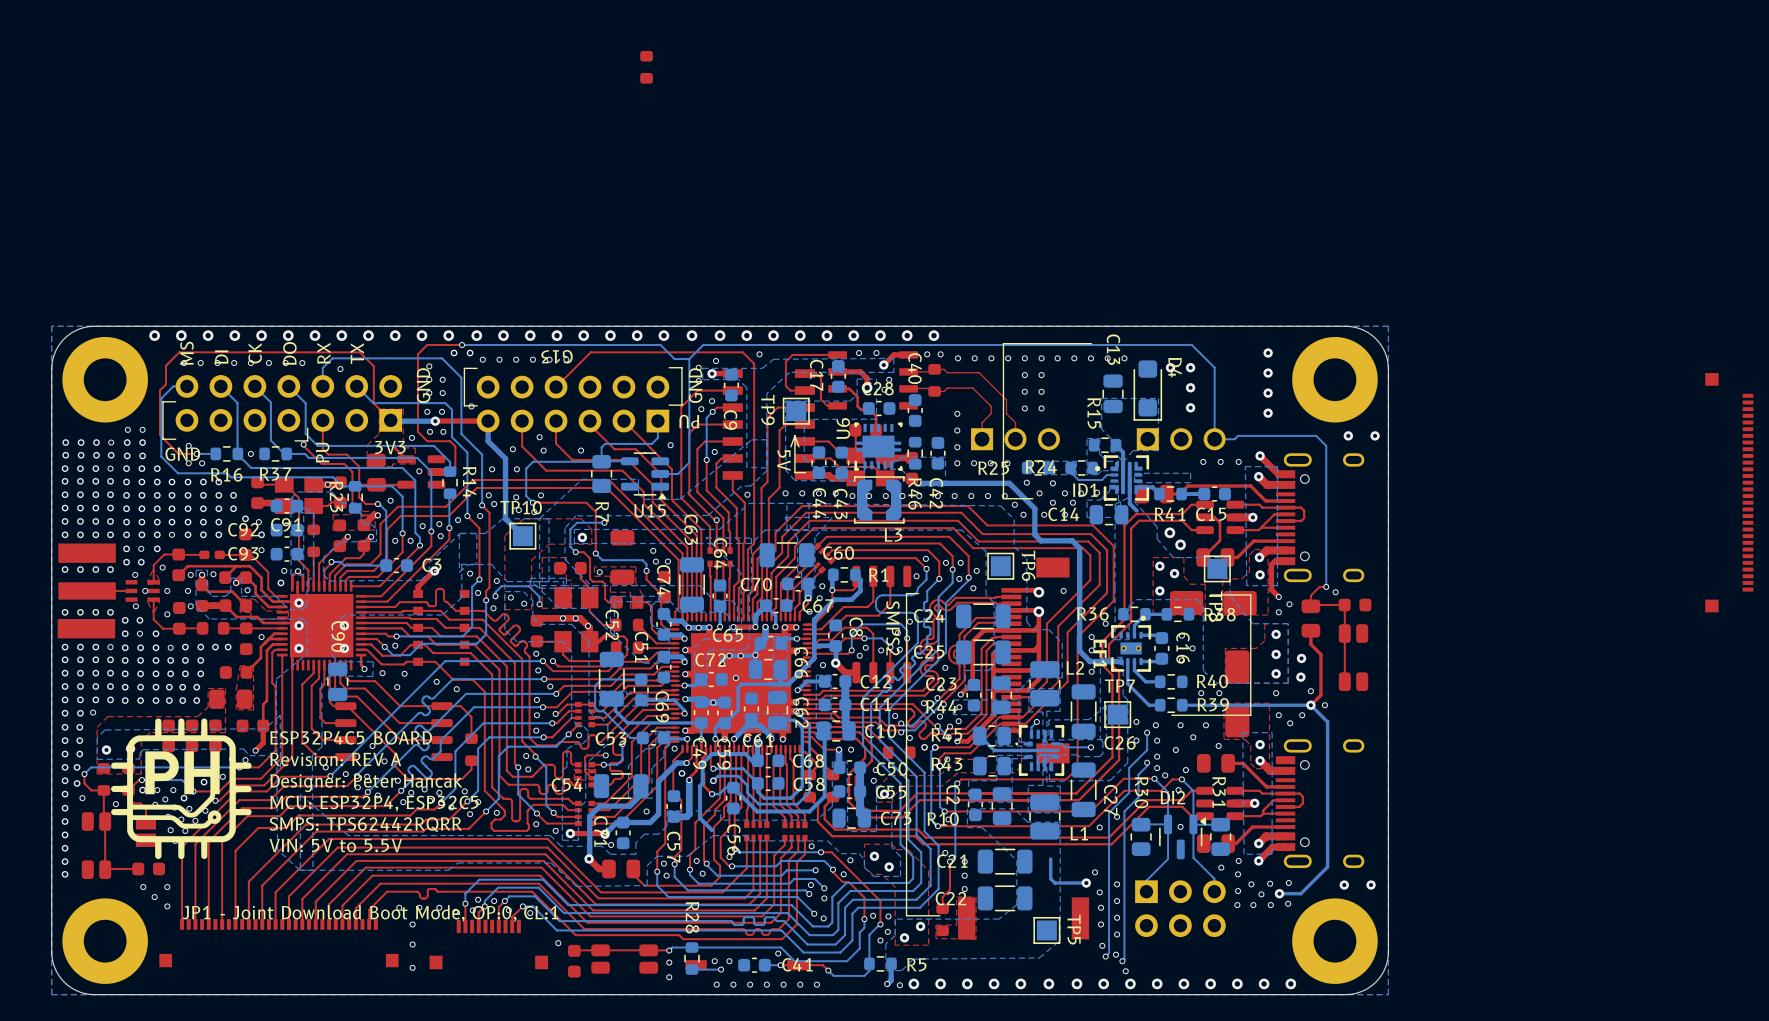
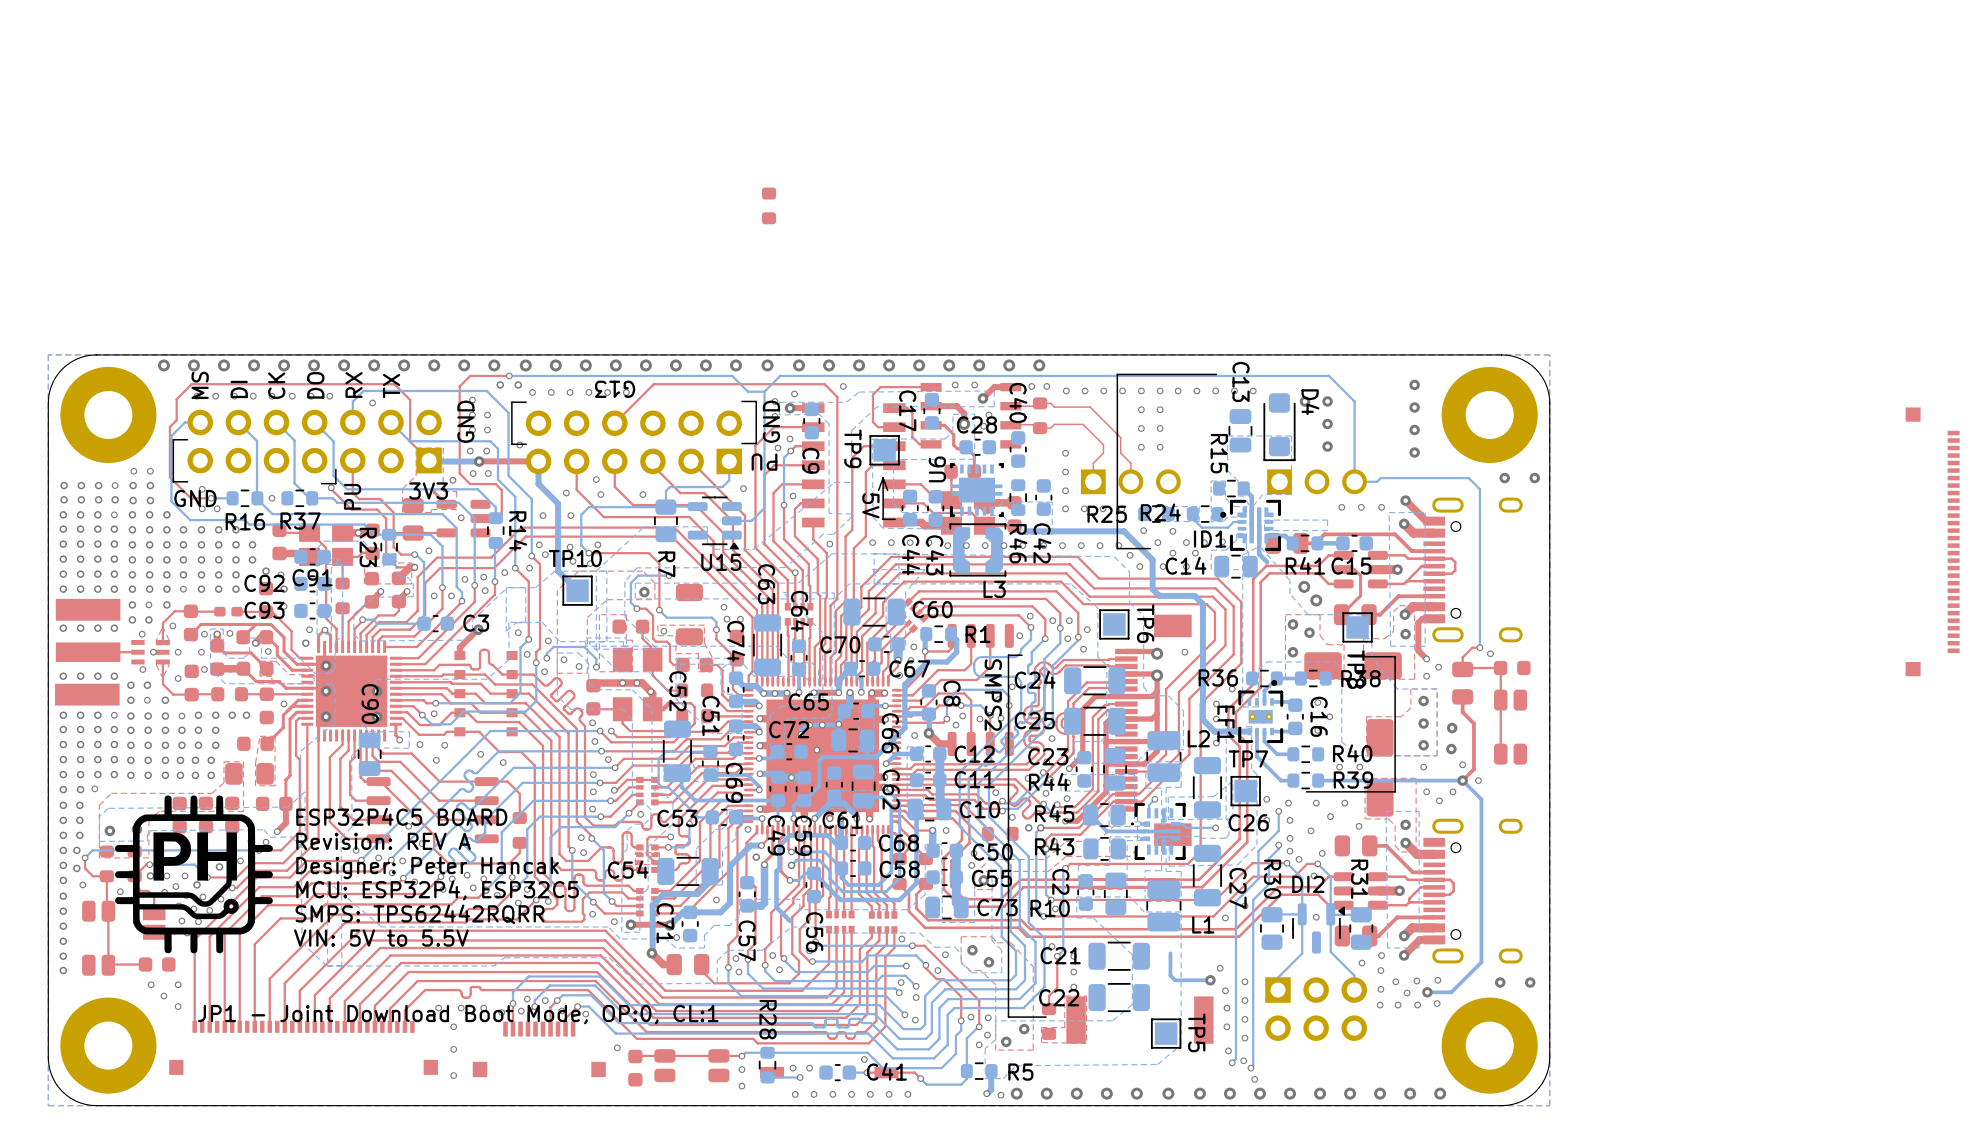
part position: (646, 67) -> (769, 205)

